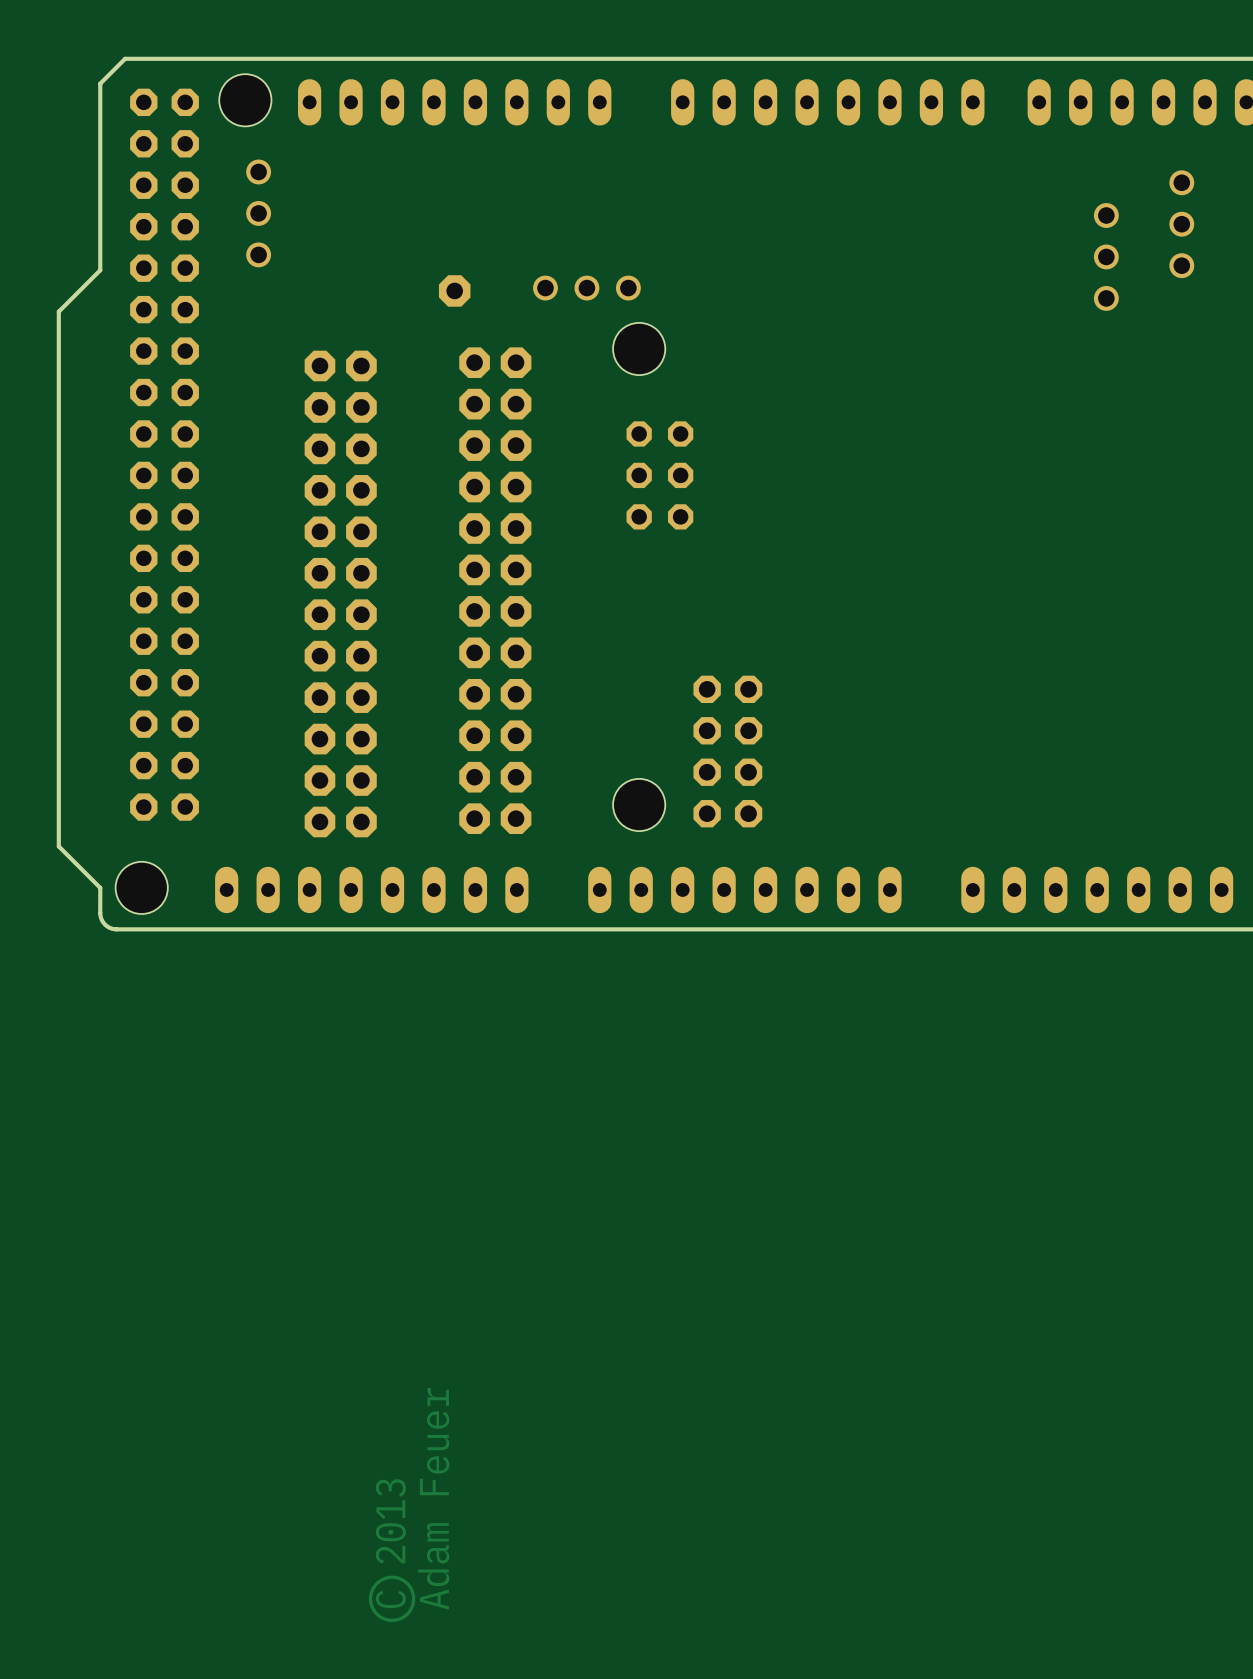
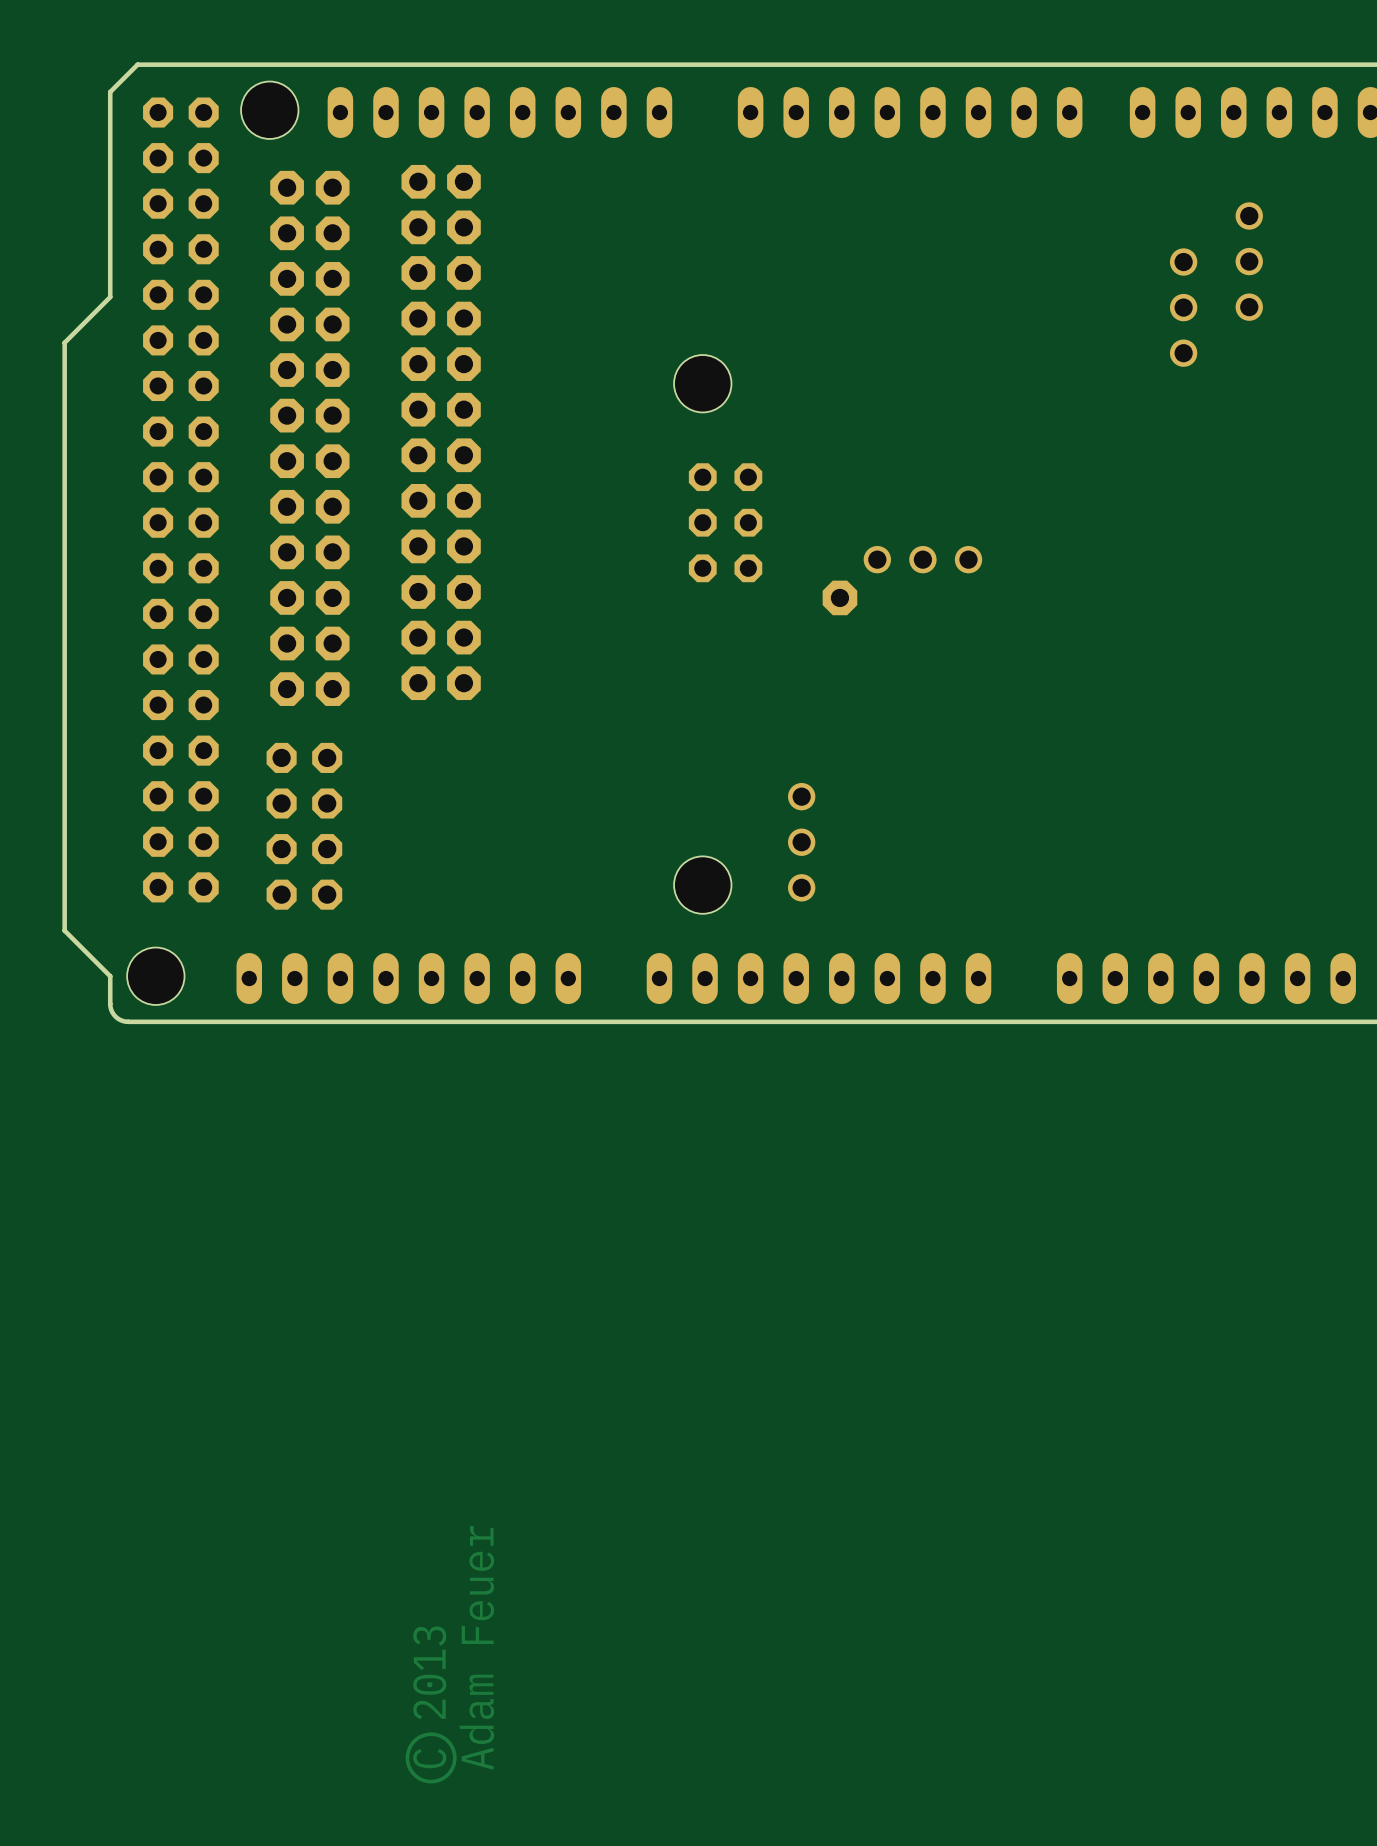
part: (258, 213) -> none
part: (1181, 224) -> none
part: none -> (1249, 261)
part: (1106, 256) -> none
part: none -> (1183, 307)
part: (586, 288) -> none
part position: (454, 290) -> (839, 597)
part: none -> (441, 432)
part: none -> (309, 438)
part: none -> (922, 559)
part: (495, 590) -> none
part: (340, 593) -> none
part footprint: [693, 675, 763, 828] -> [788, 782, 816, 902]
part: none -> (304, 826)

